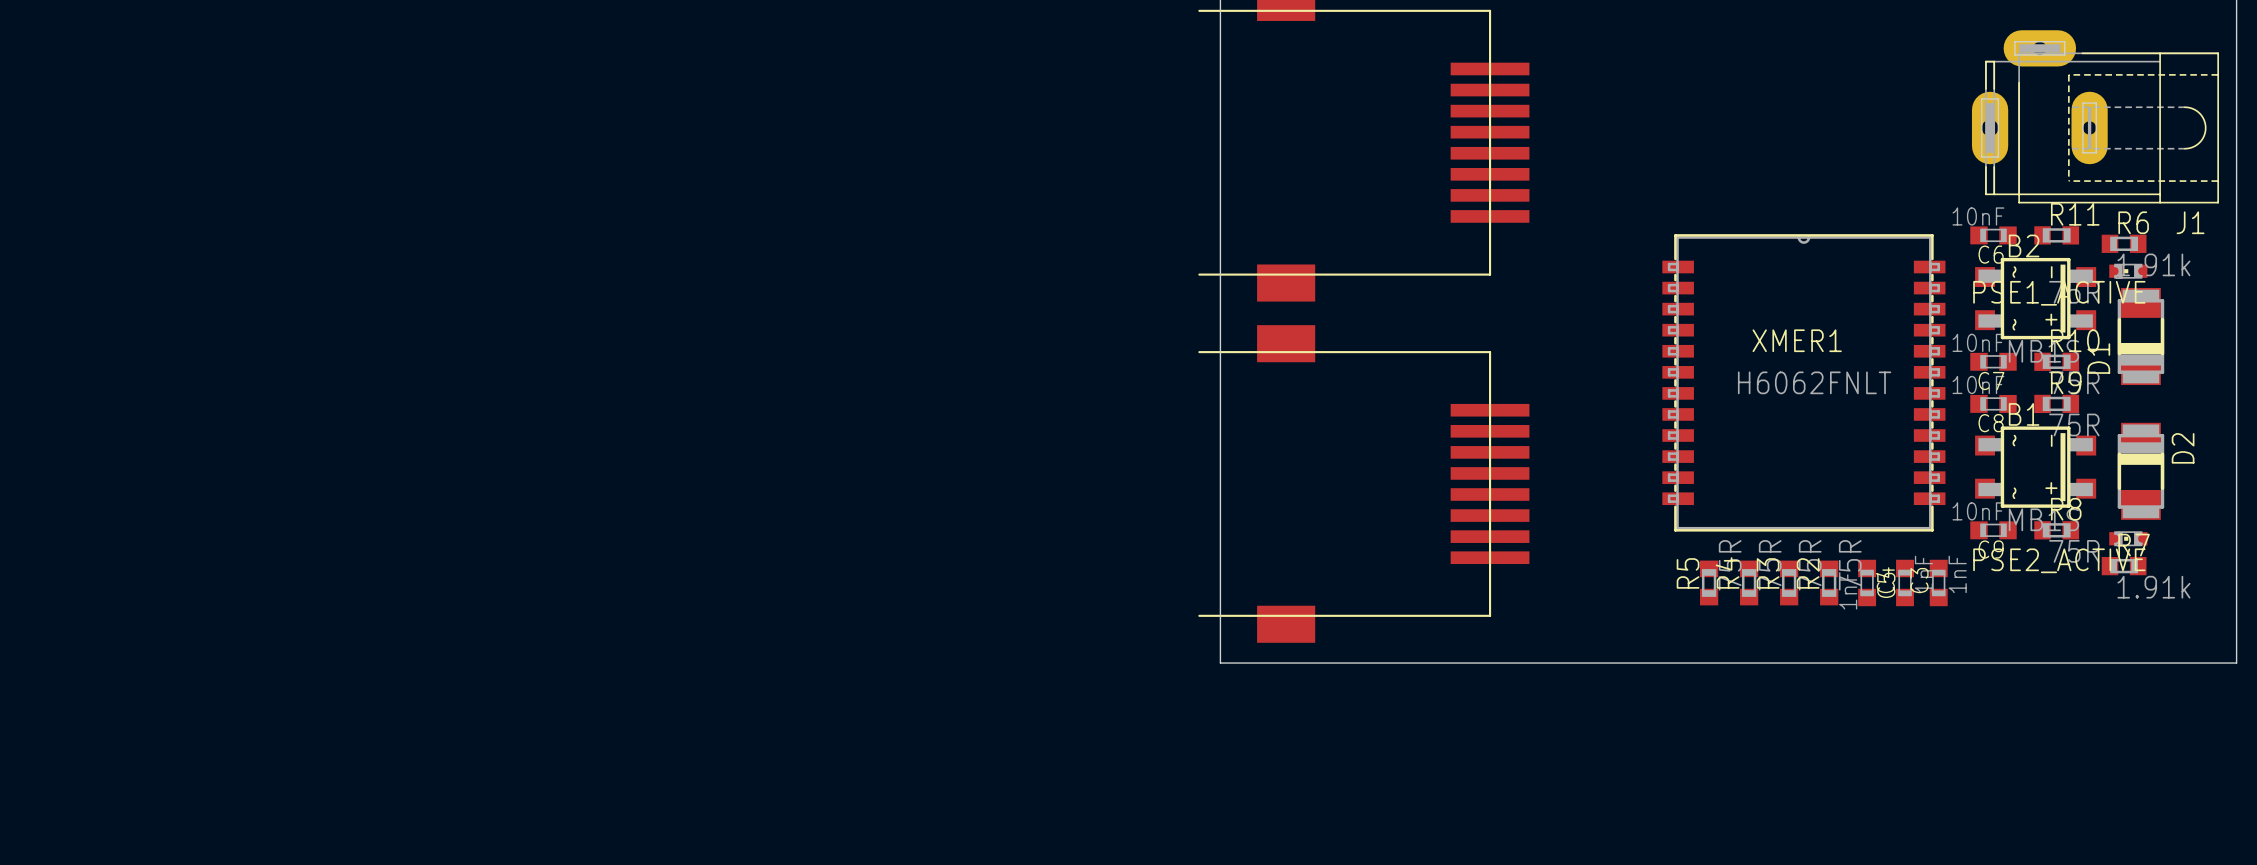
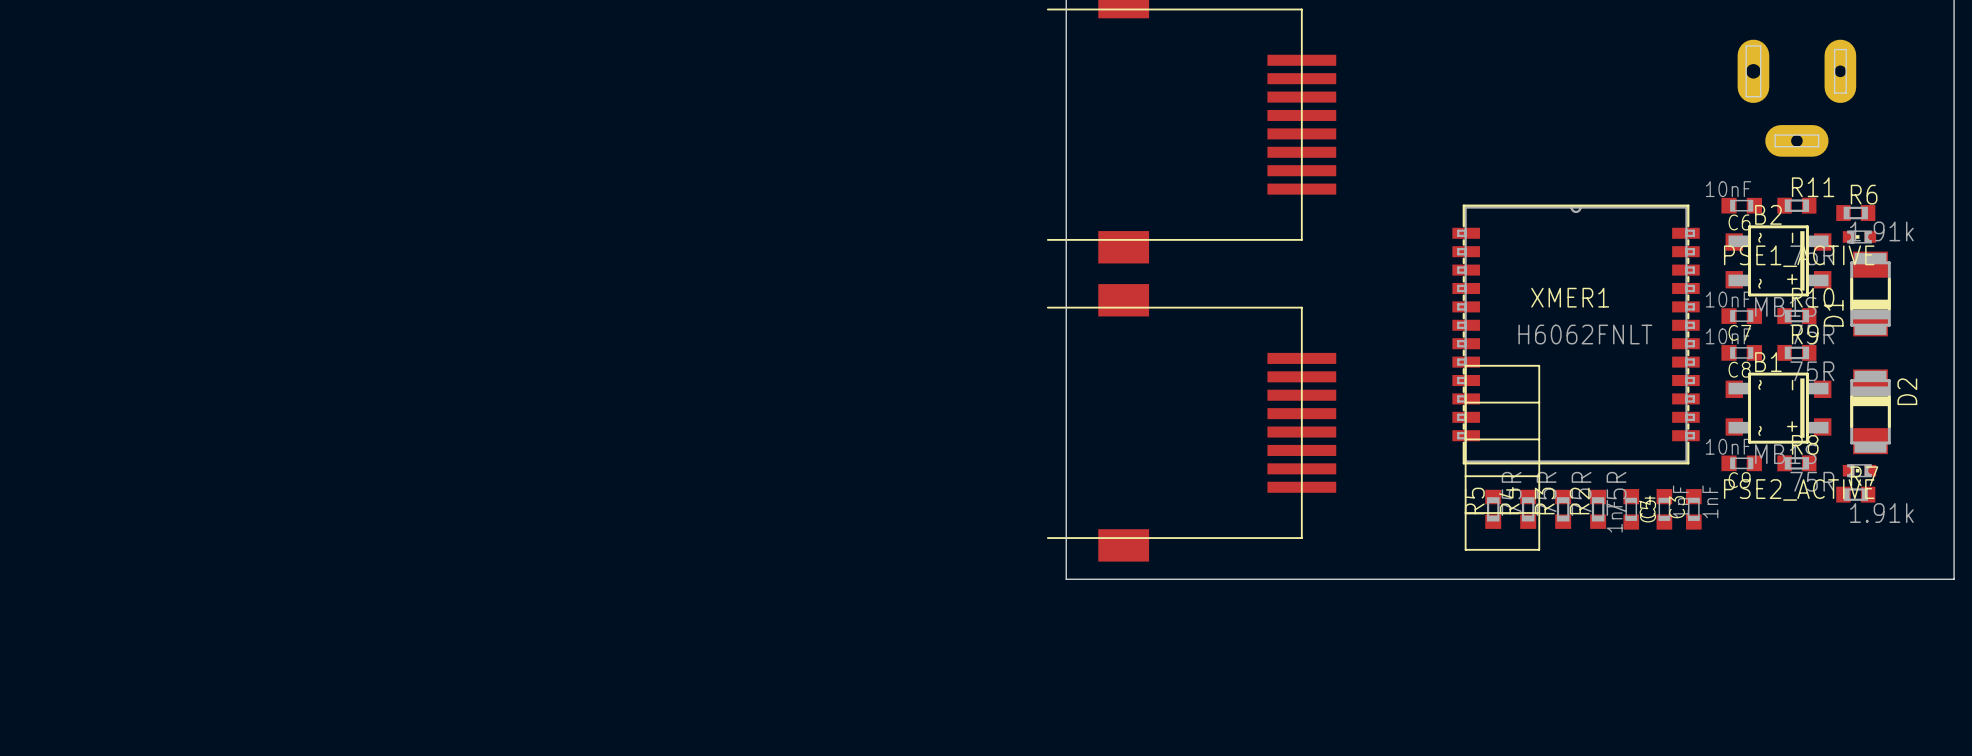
J1 side: top (2095, 116) -> bottom (1796, 98)
part: none -> (1502, 457)

